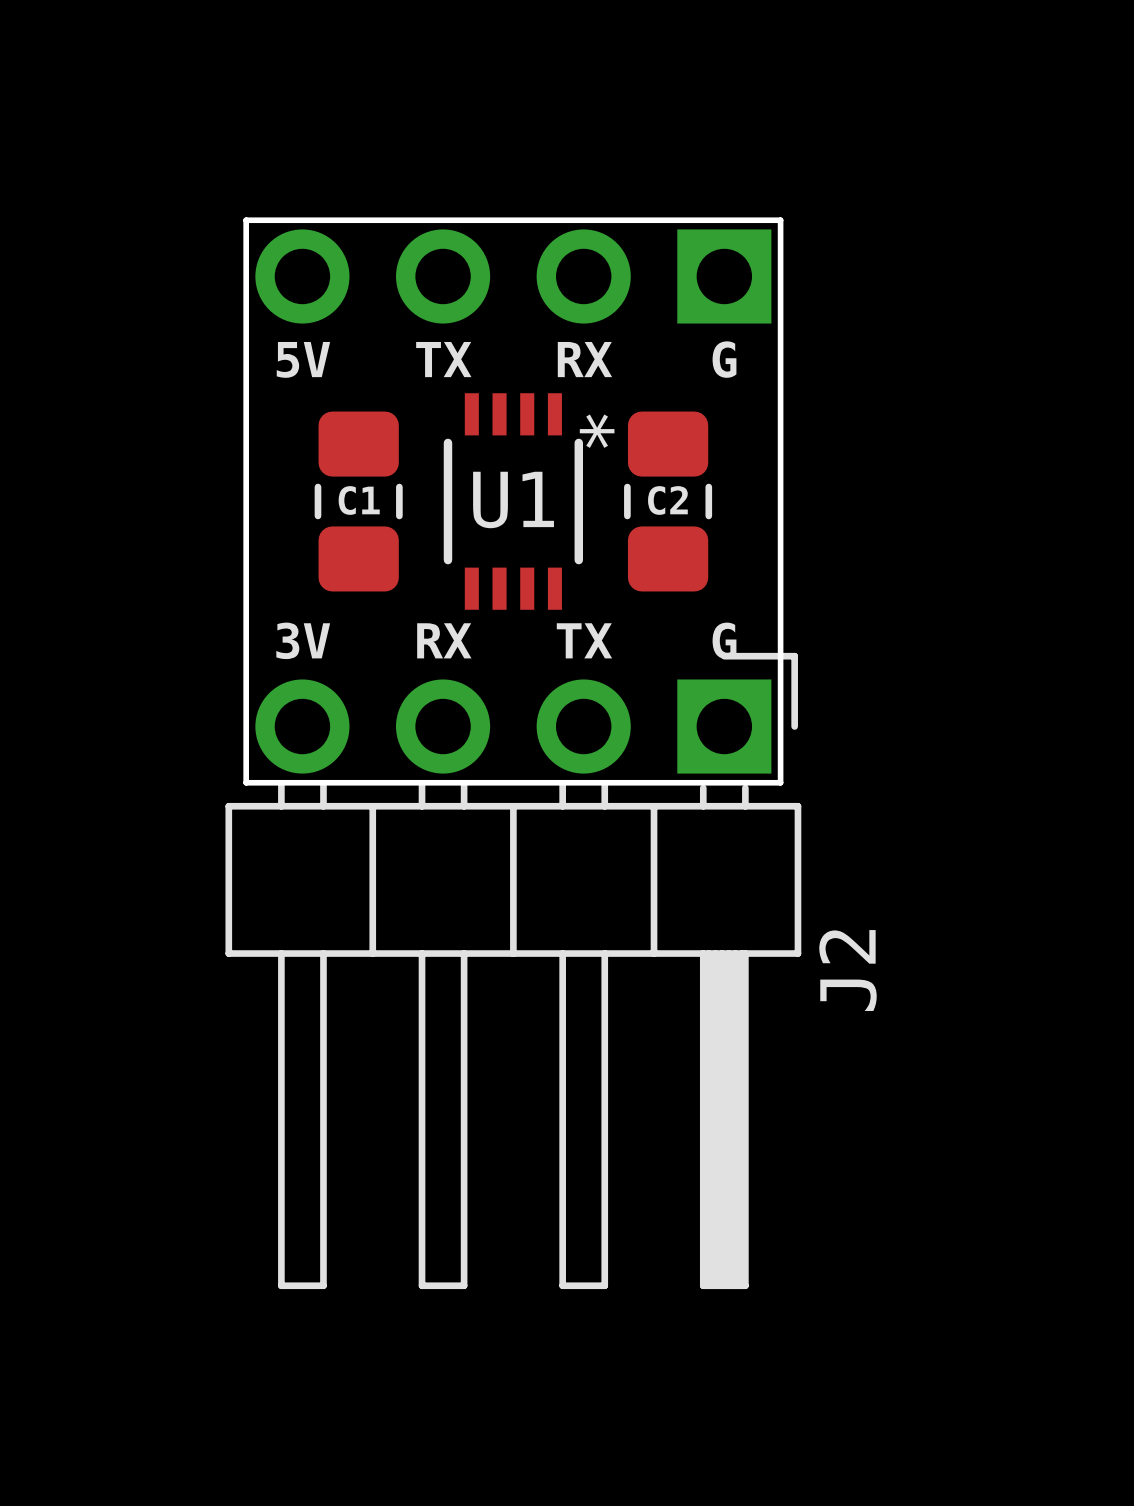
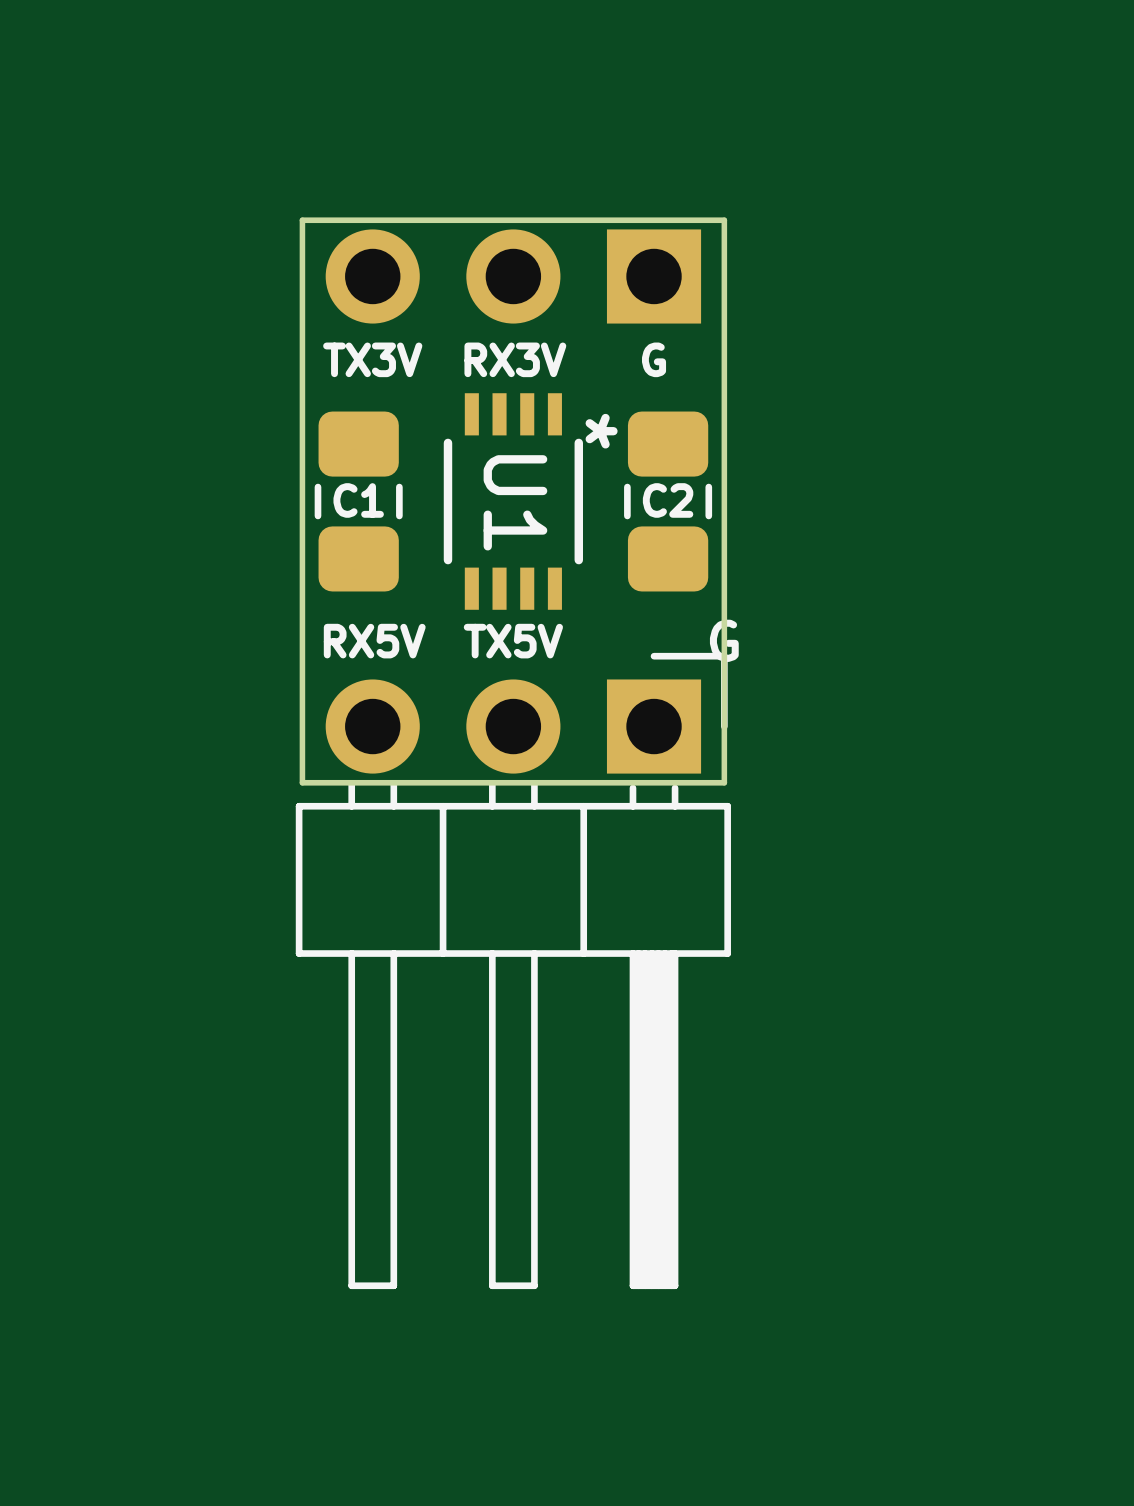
board edge: (302, 220) (246, 220) (246, 782) (302, 782) -> (302, 220) (302, 782)
board edge: (724, 220) (780, 220) (780, 782) (724, 782) -> (724, 220) (724, 782)
part footprint: [255, 229, 772, 324] -> [325, 229, 702, 324]
text: 5V (303, 359) -> none
text: TX (443, 359) -> TX3V (372, 359)
text: RX (584, 359) -> RX3V (515, 359)
text position: G (724, 359) -> G (654, 359)
U1 name rotation: 0° (513, 499) -> 90° clockwise (515, 502)
text: 3V (303, 640) -> none
text: RX (444, 640) -> RX5V (374, 641)
text: TX (584, 640) -> TX5V (513, 641)
J2: (513, 970) -> none
part: none -> (513, 970)

